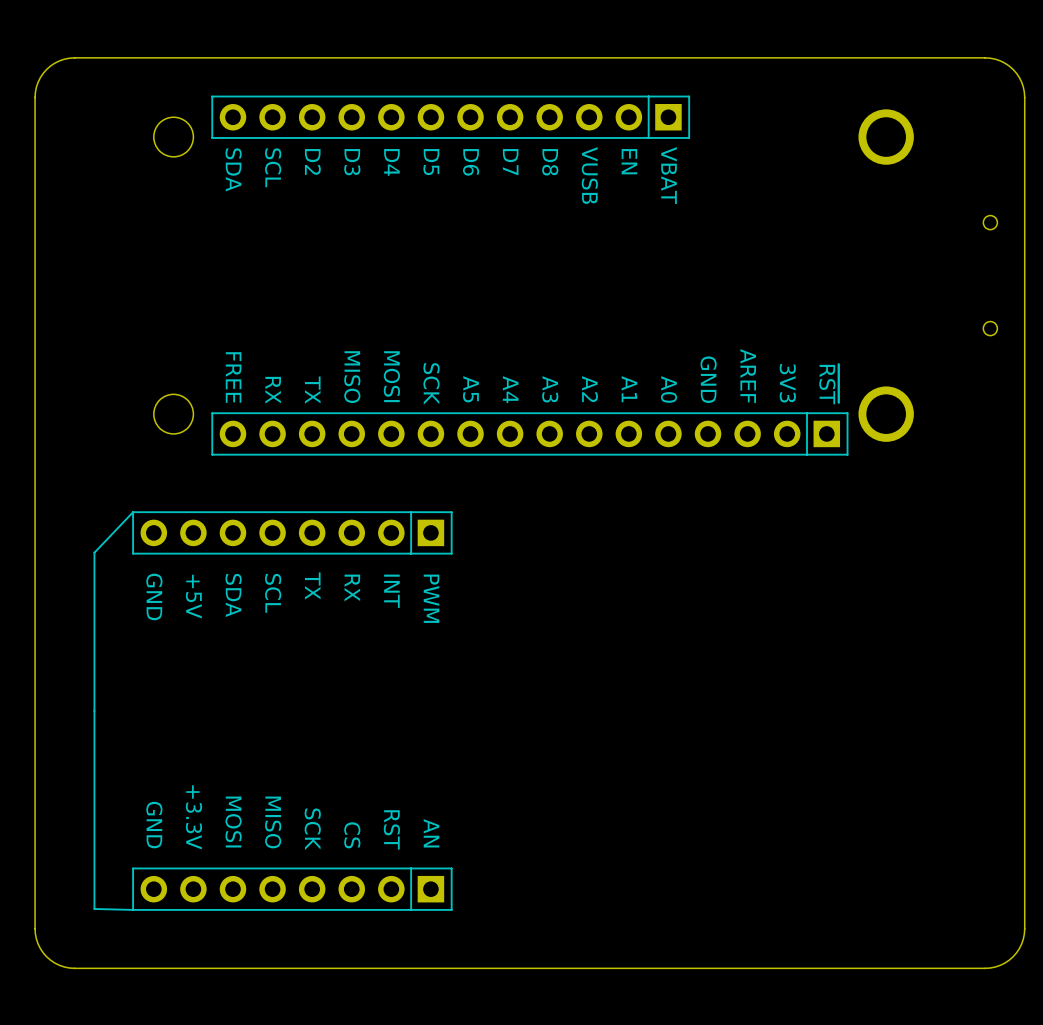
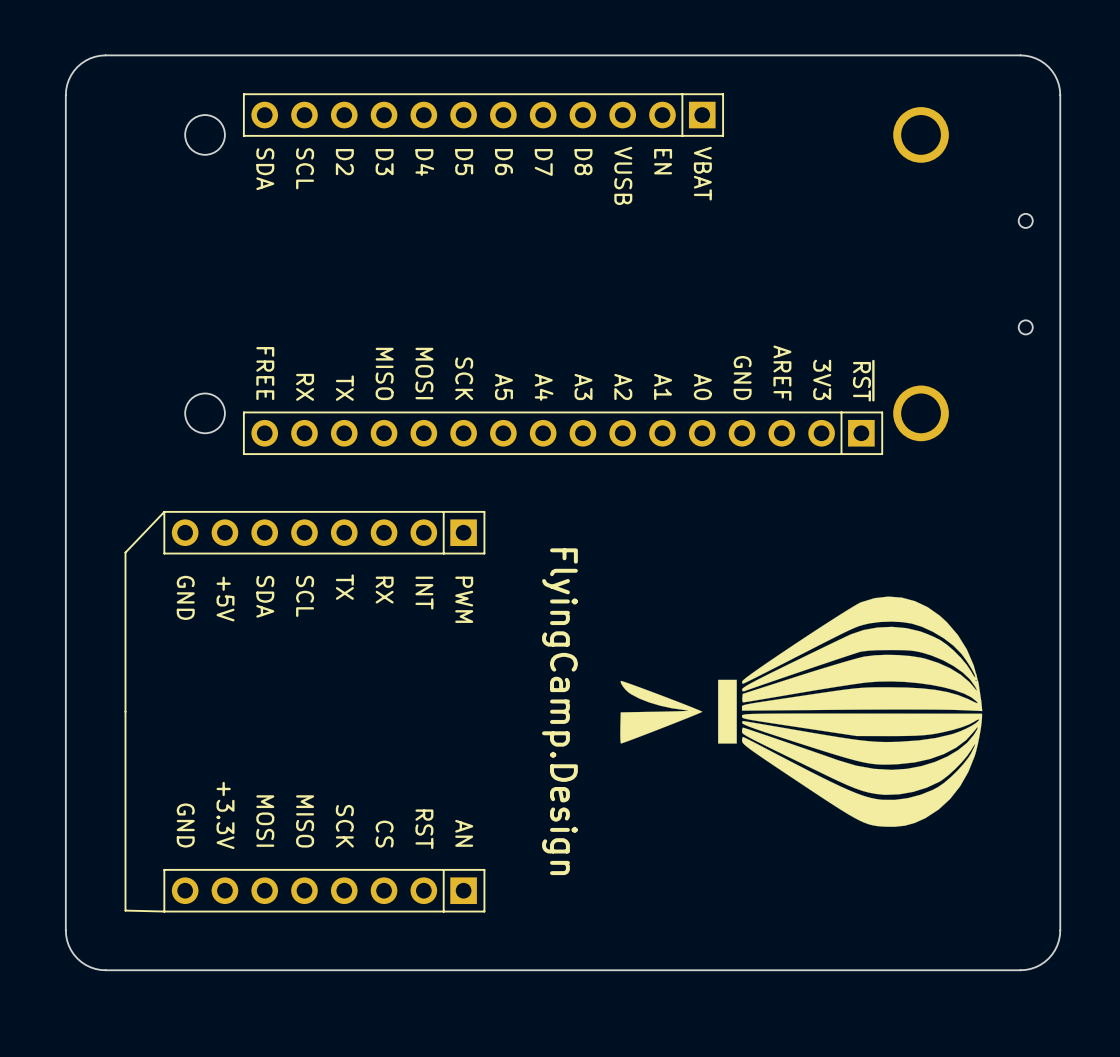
drawing: none -> [620, 596, 983, 827]
text: none -> FlyingCamp.Design (559, 711)

